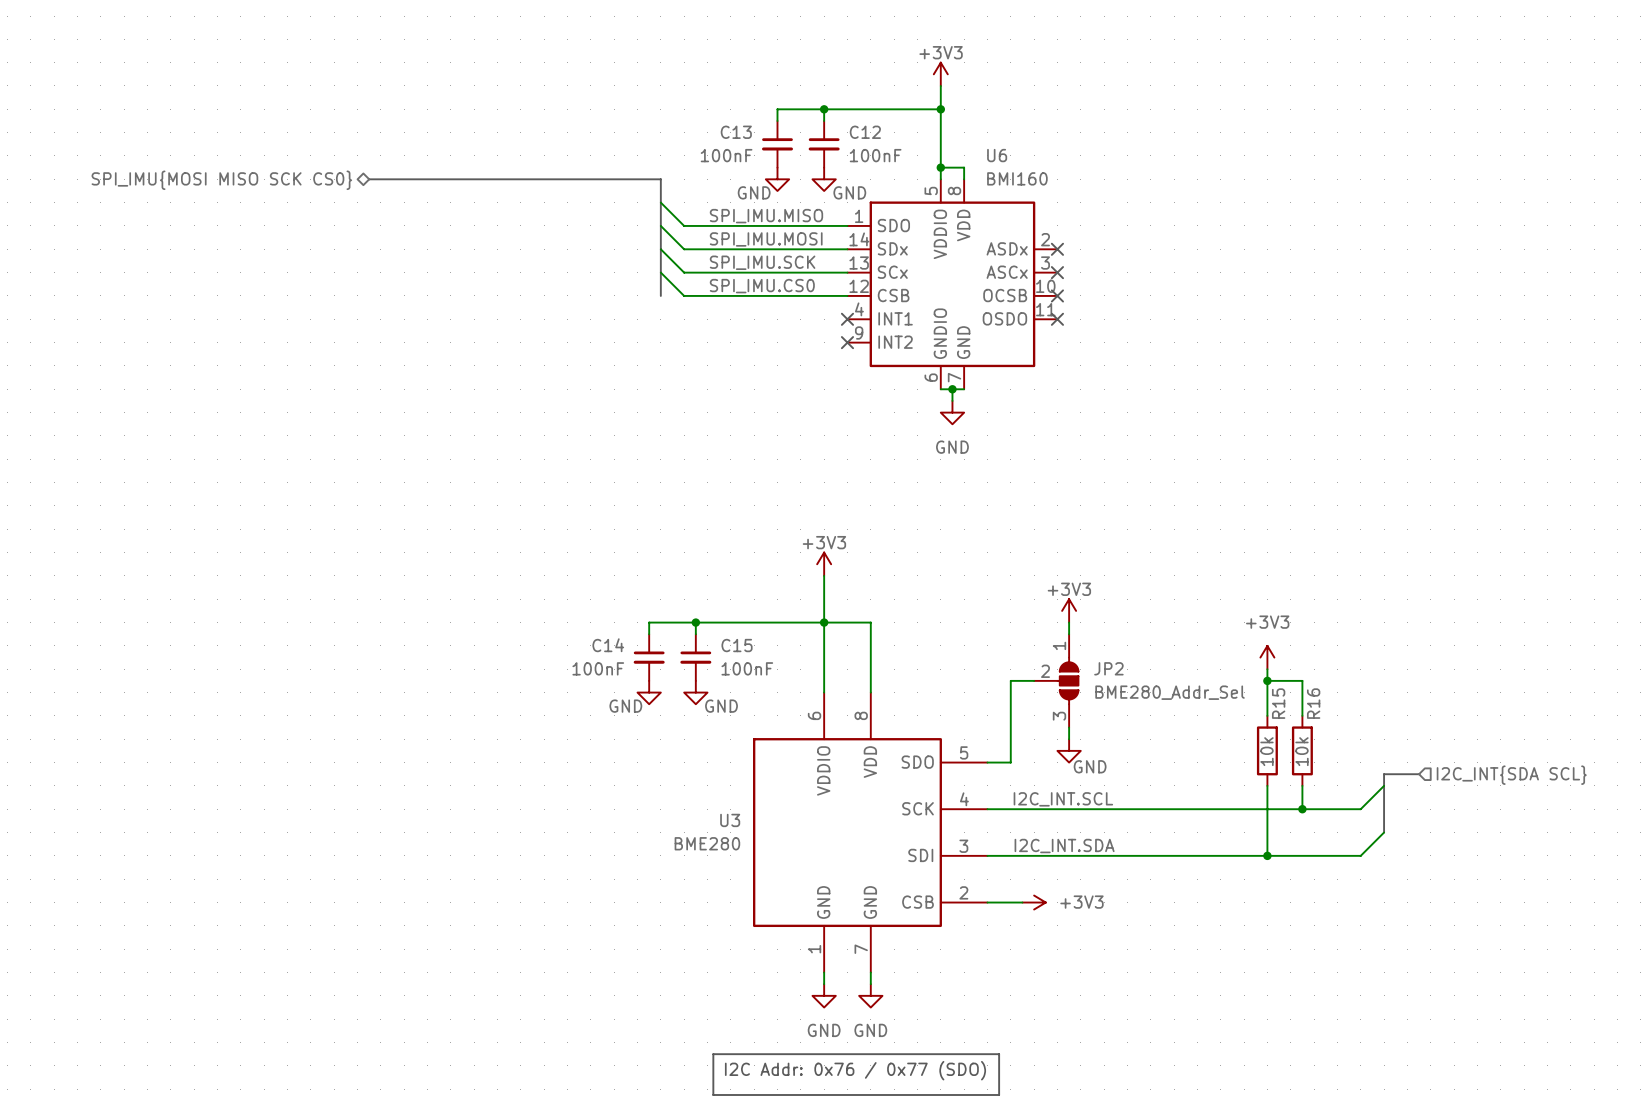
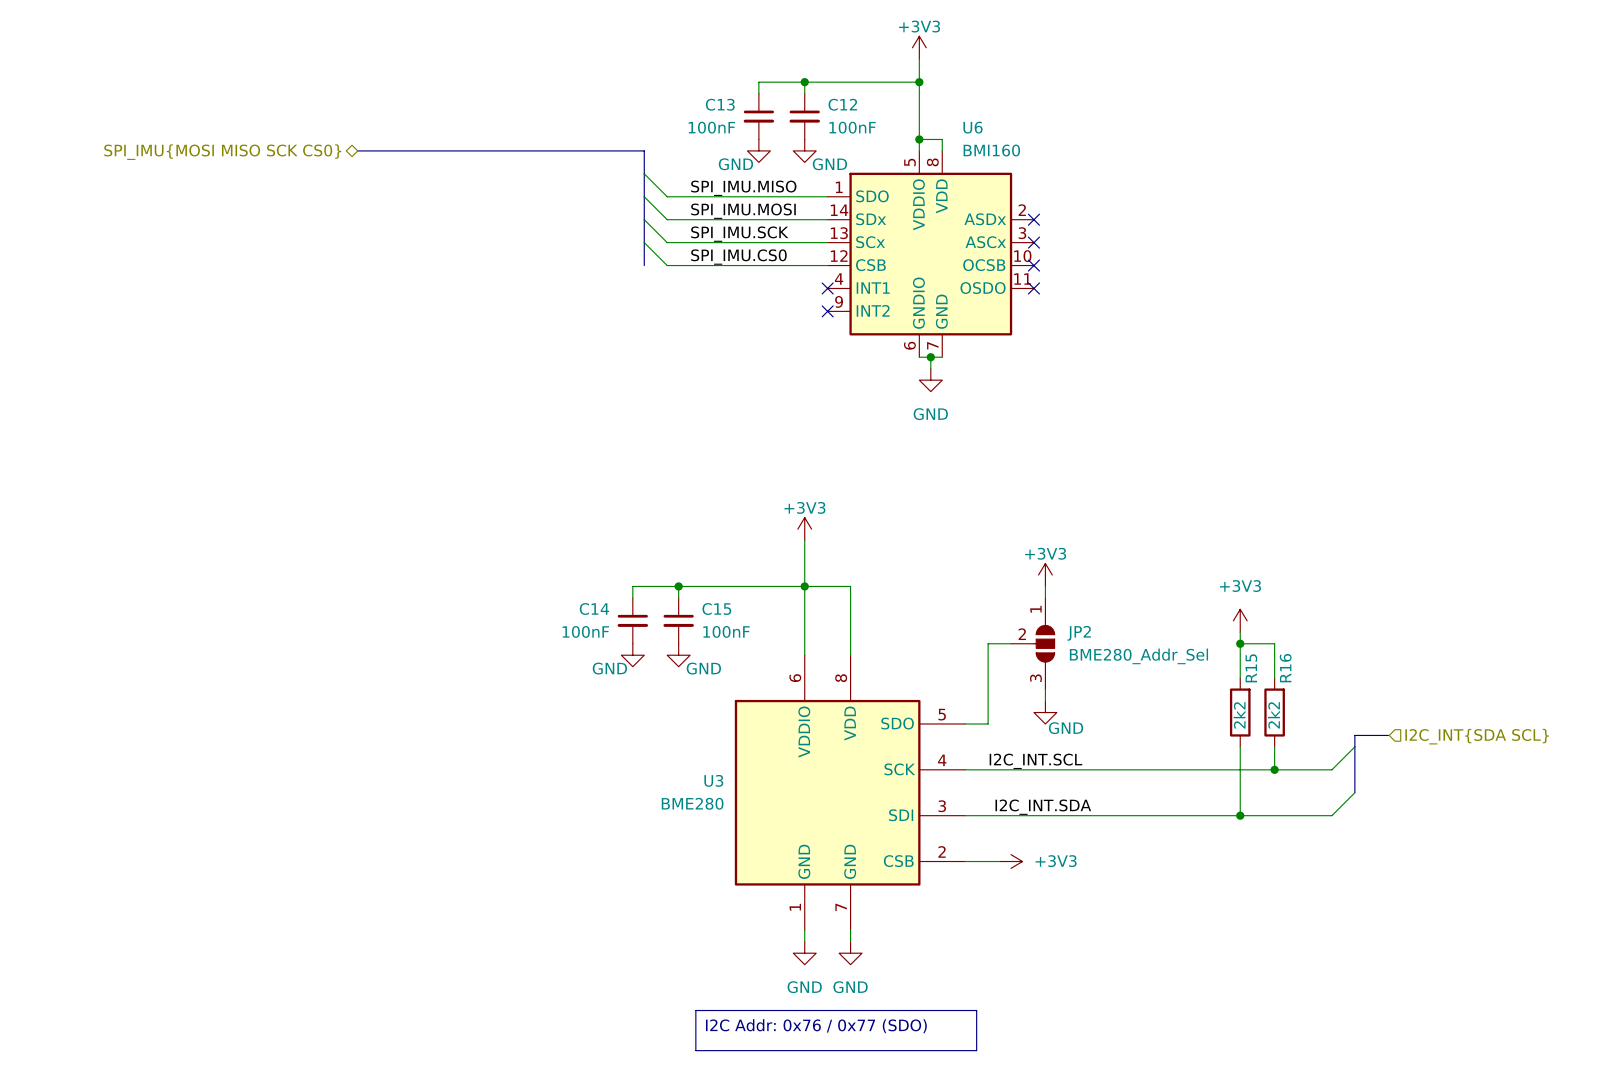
R15 value: 10k (1266, 751) -> 2k2 (1239, 715)
R16 value: 10k (1301, 751) -> 2k2 (1273, 715)

